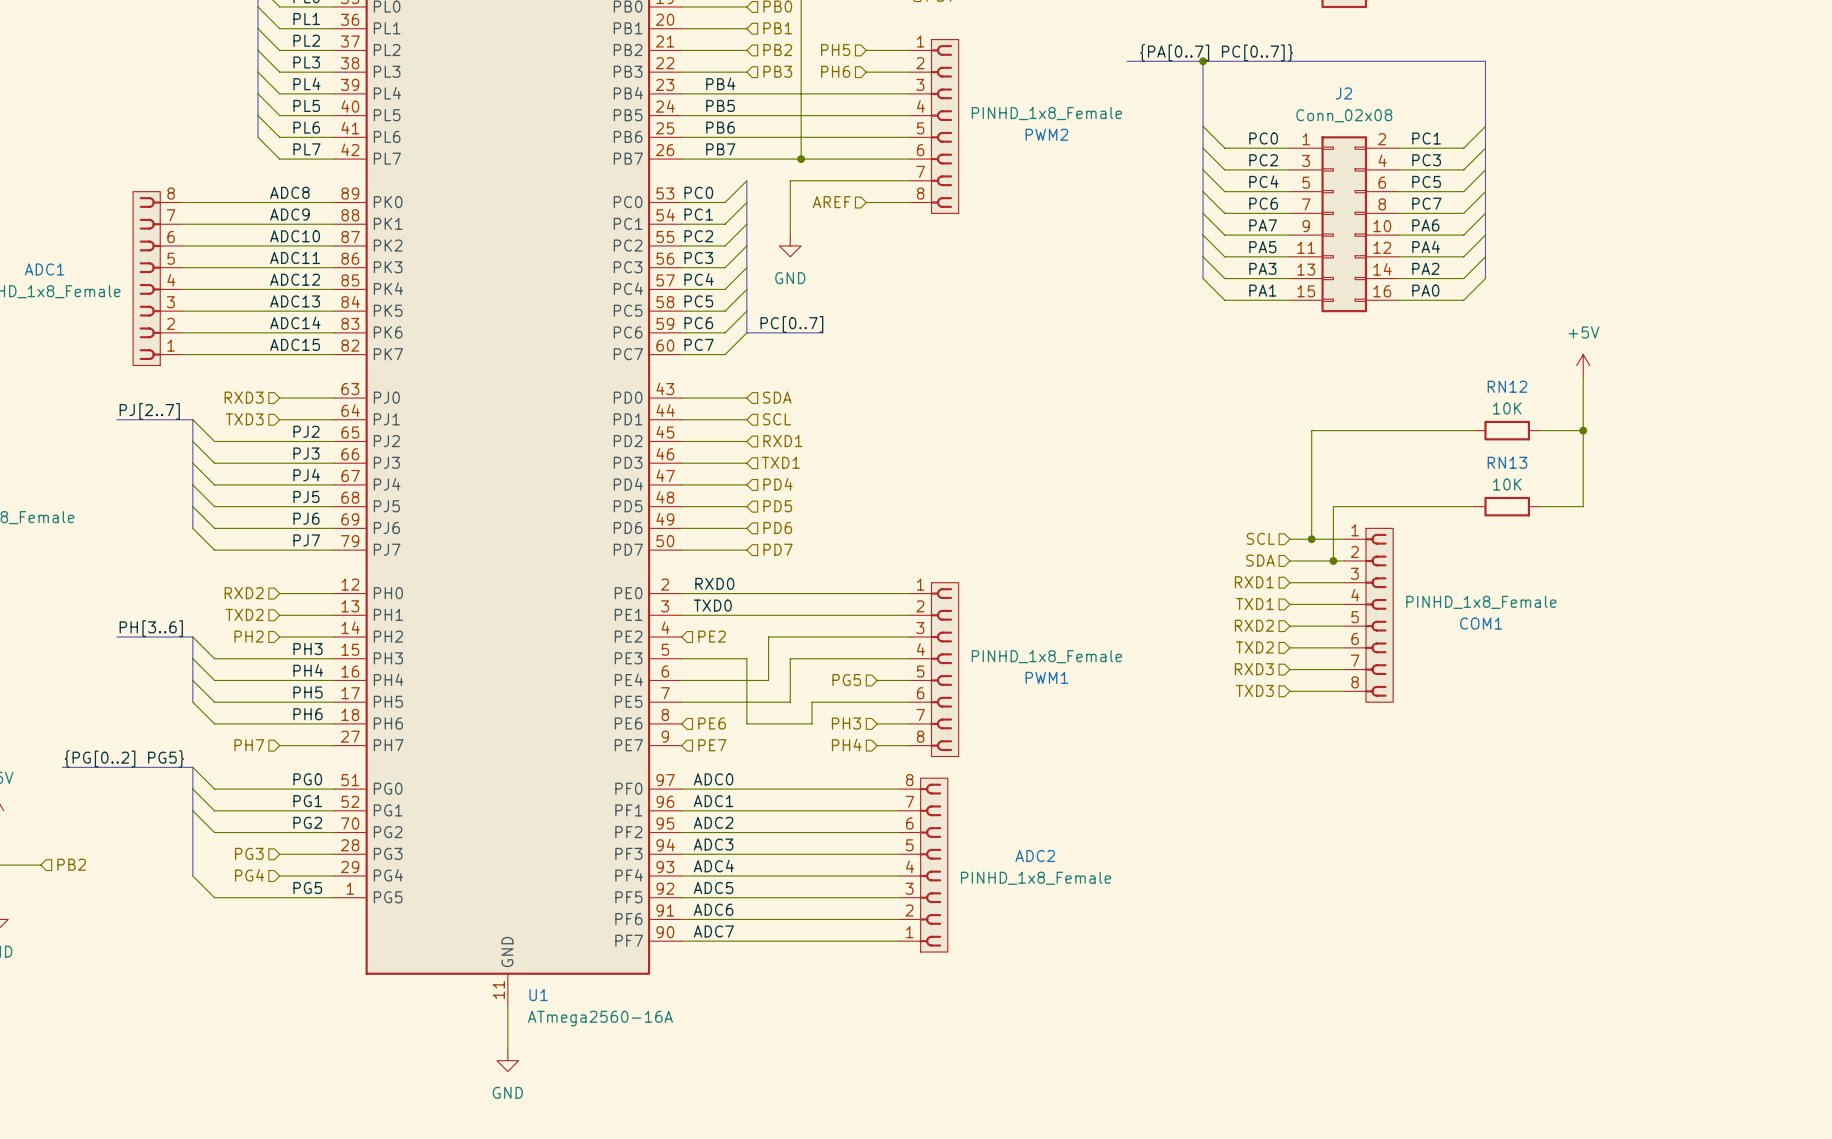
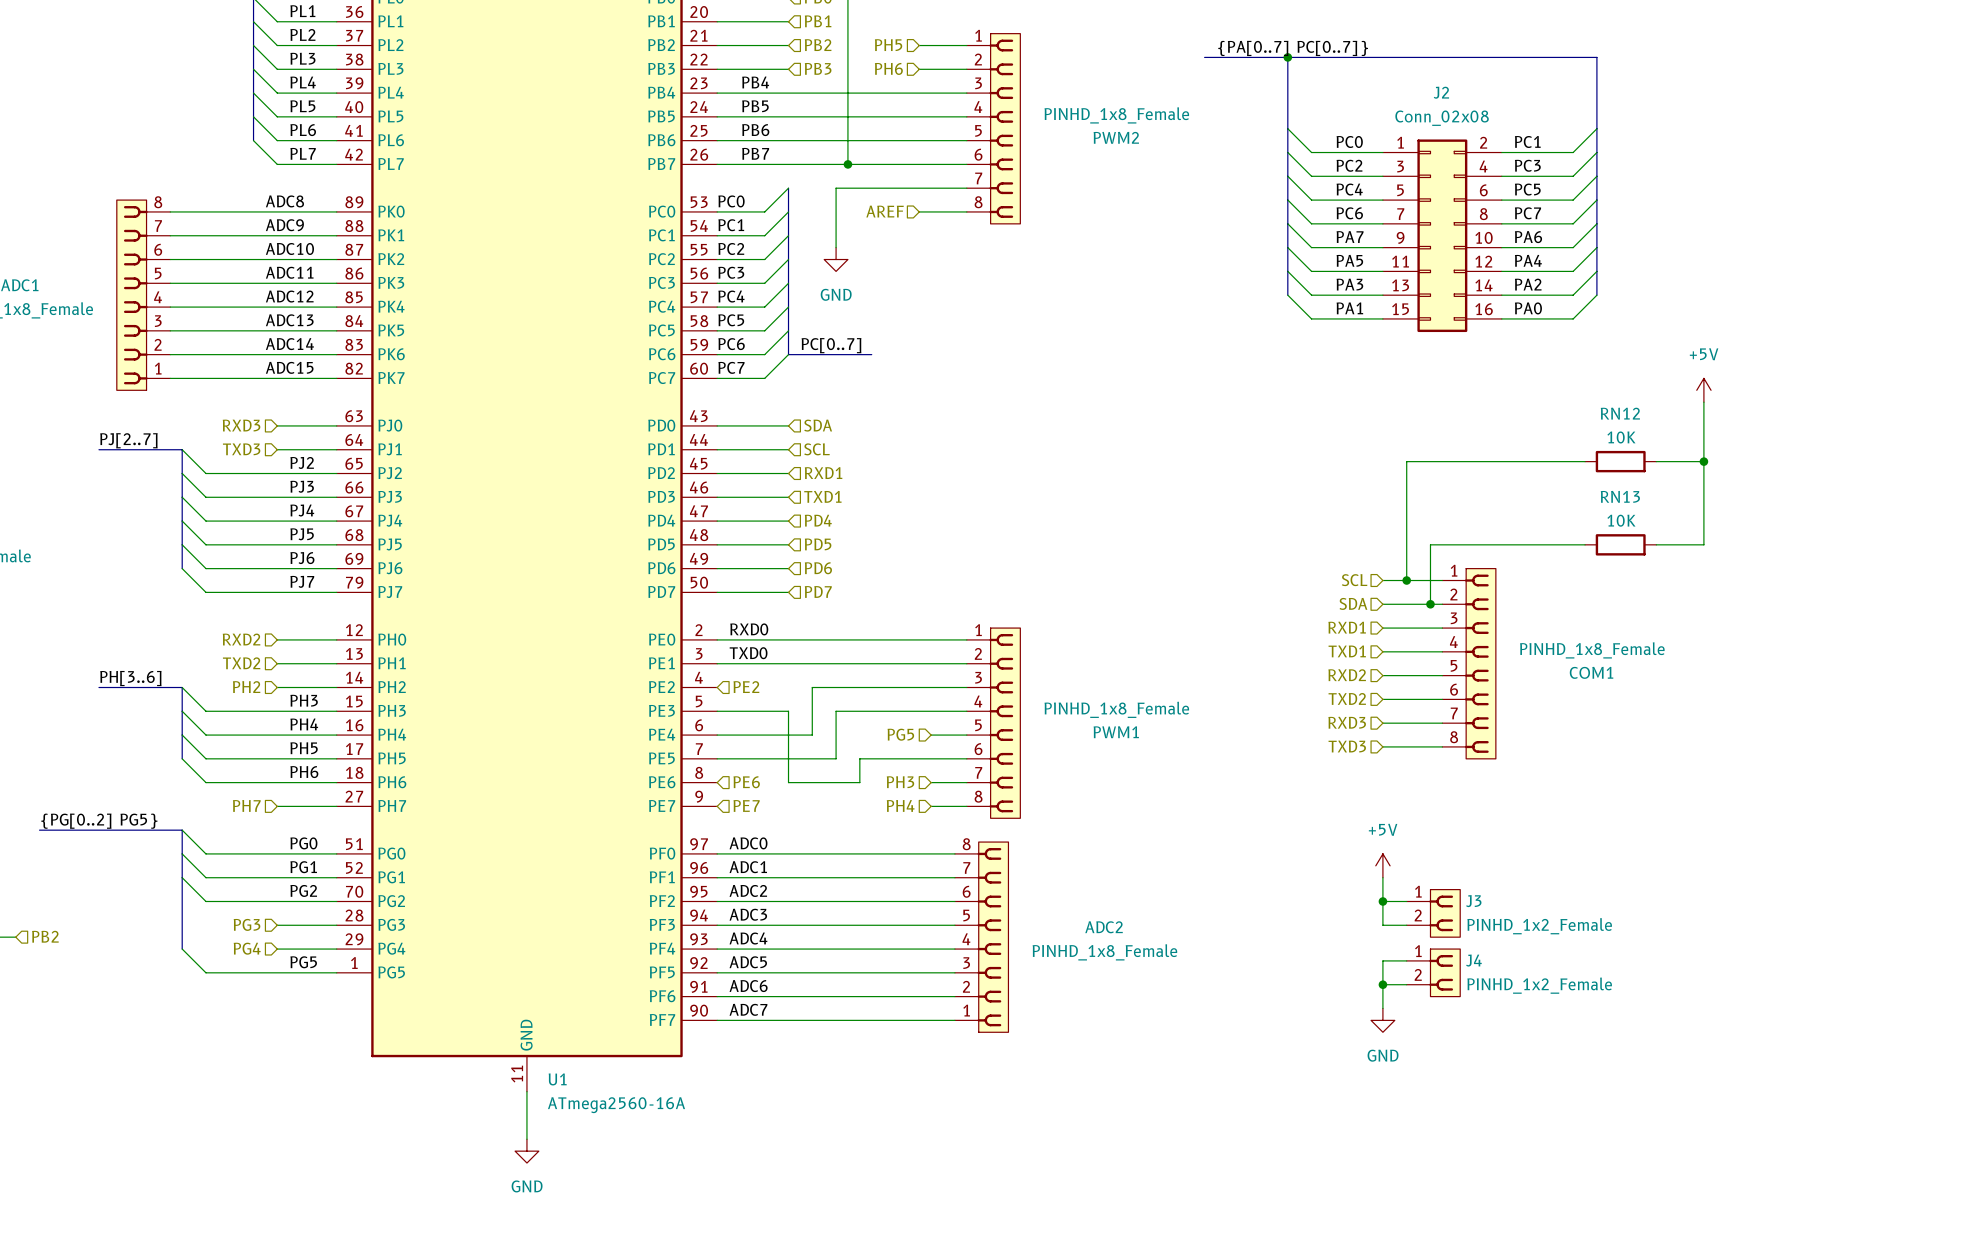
power symbol: none -> +5V (1382, 865)
wire: none -> (1382, 877) (1382, 925) (1406, 925)
wire: none -> (1382, 901) (1406, 901)
junction: none -> (1382, 901)
J3: none -> PINHD_1x2_Female (1433, 913)
wire: none -> (1406, 960) (1382, 960) (1382, 1008)
J4: none -> PINHD_1x2_Female (1433, 972)
wire: none -> (1382, 984) (1406, 984)
junction: none -> (1382, 984)
power symbol: none -> GND (1382, 1020)

